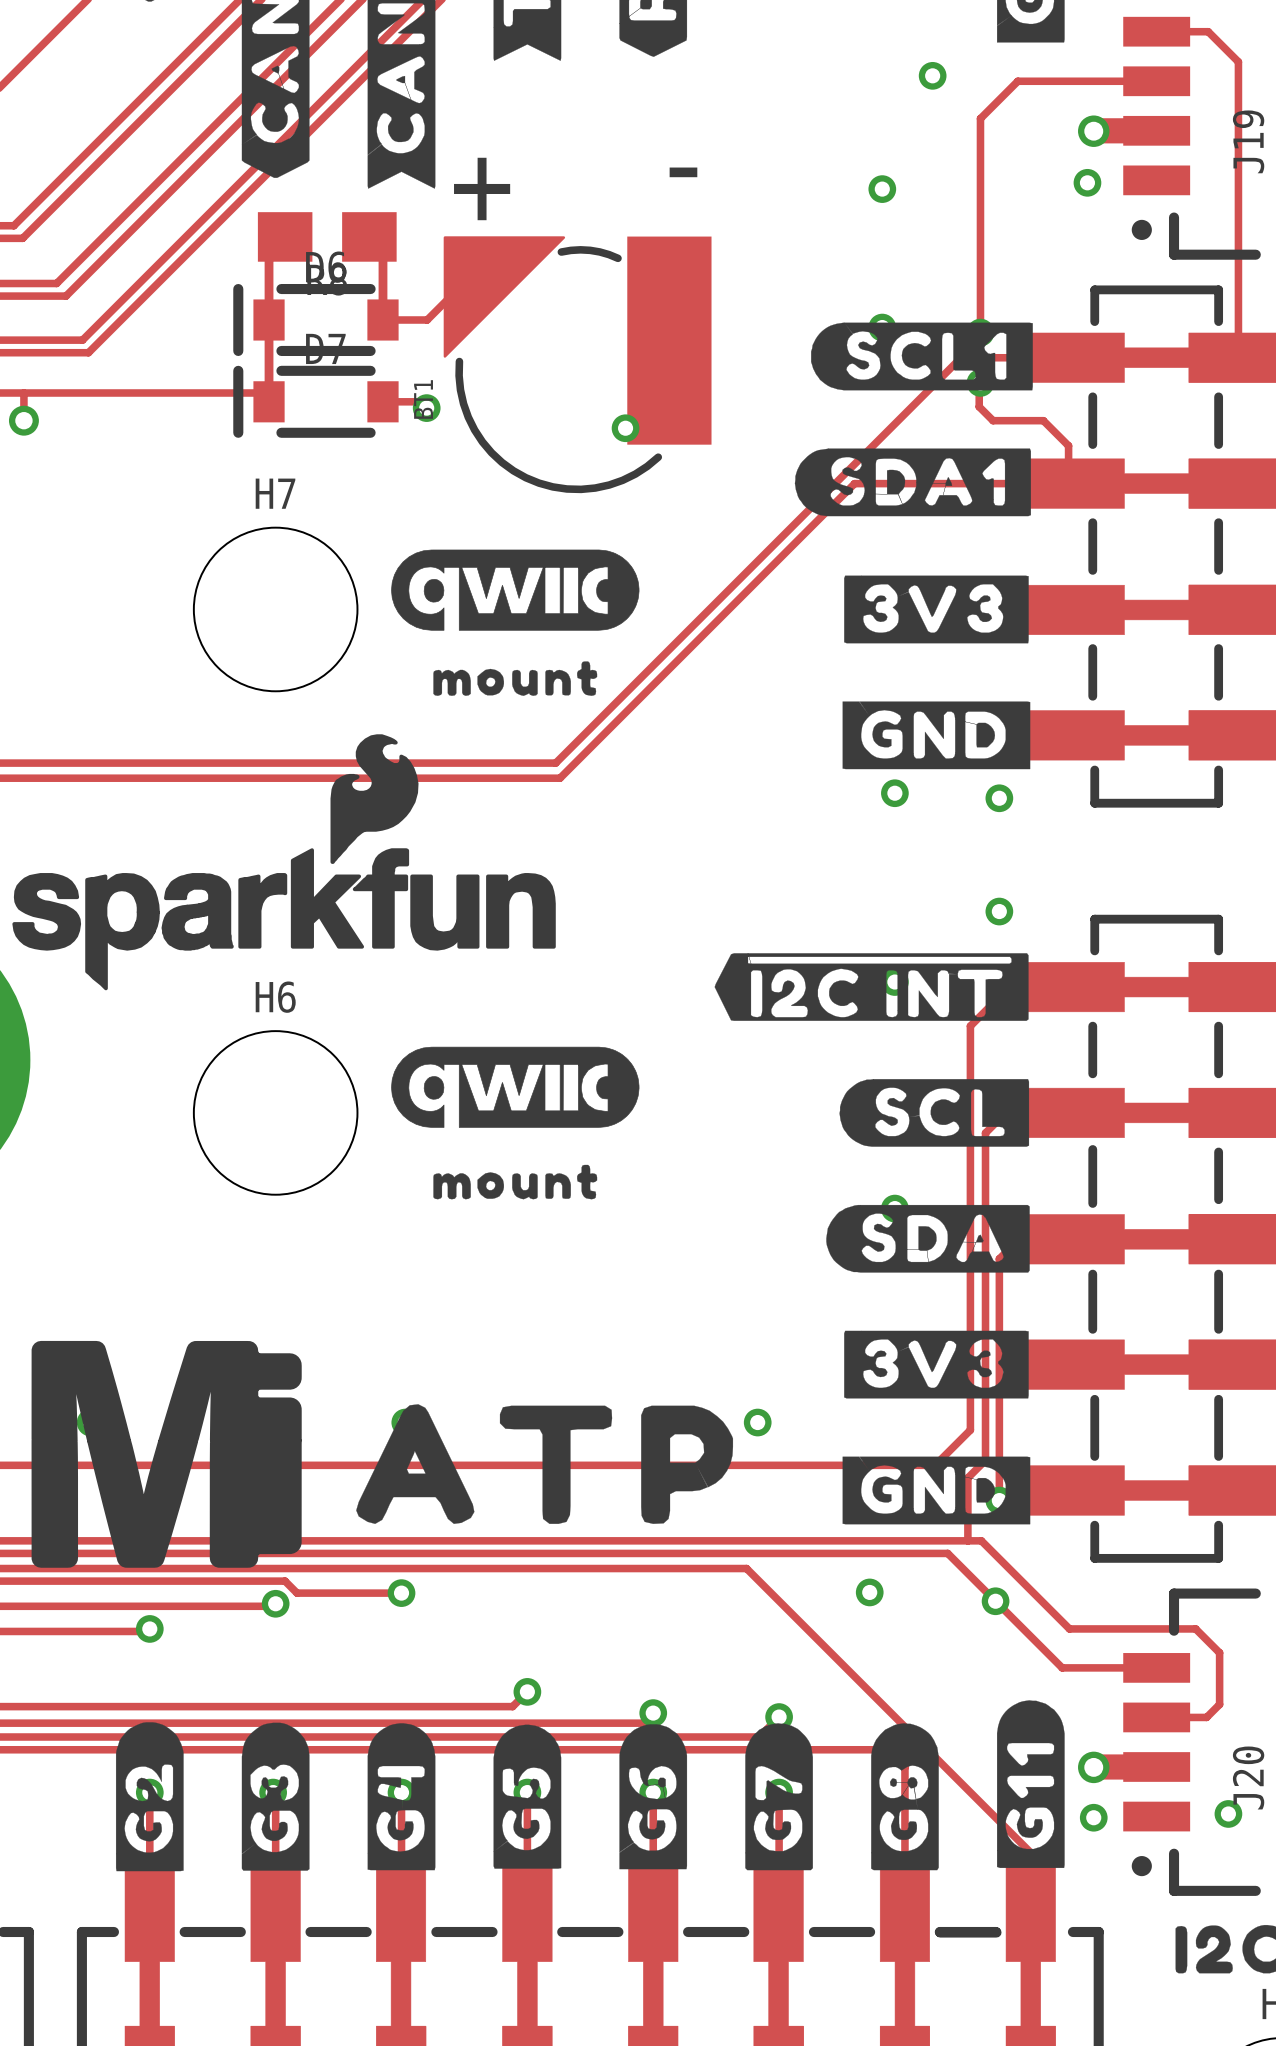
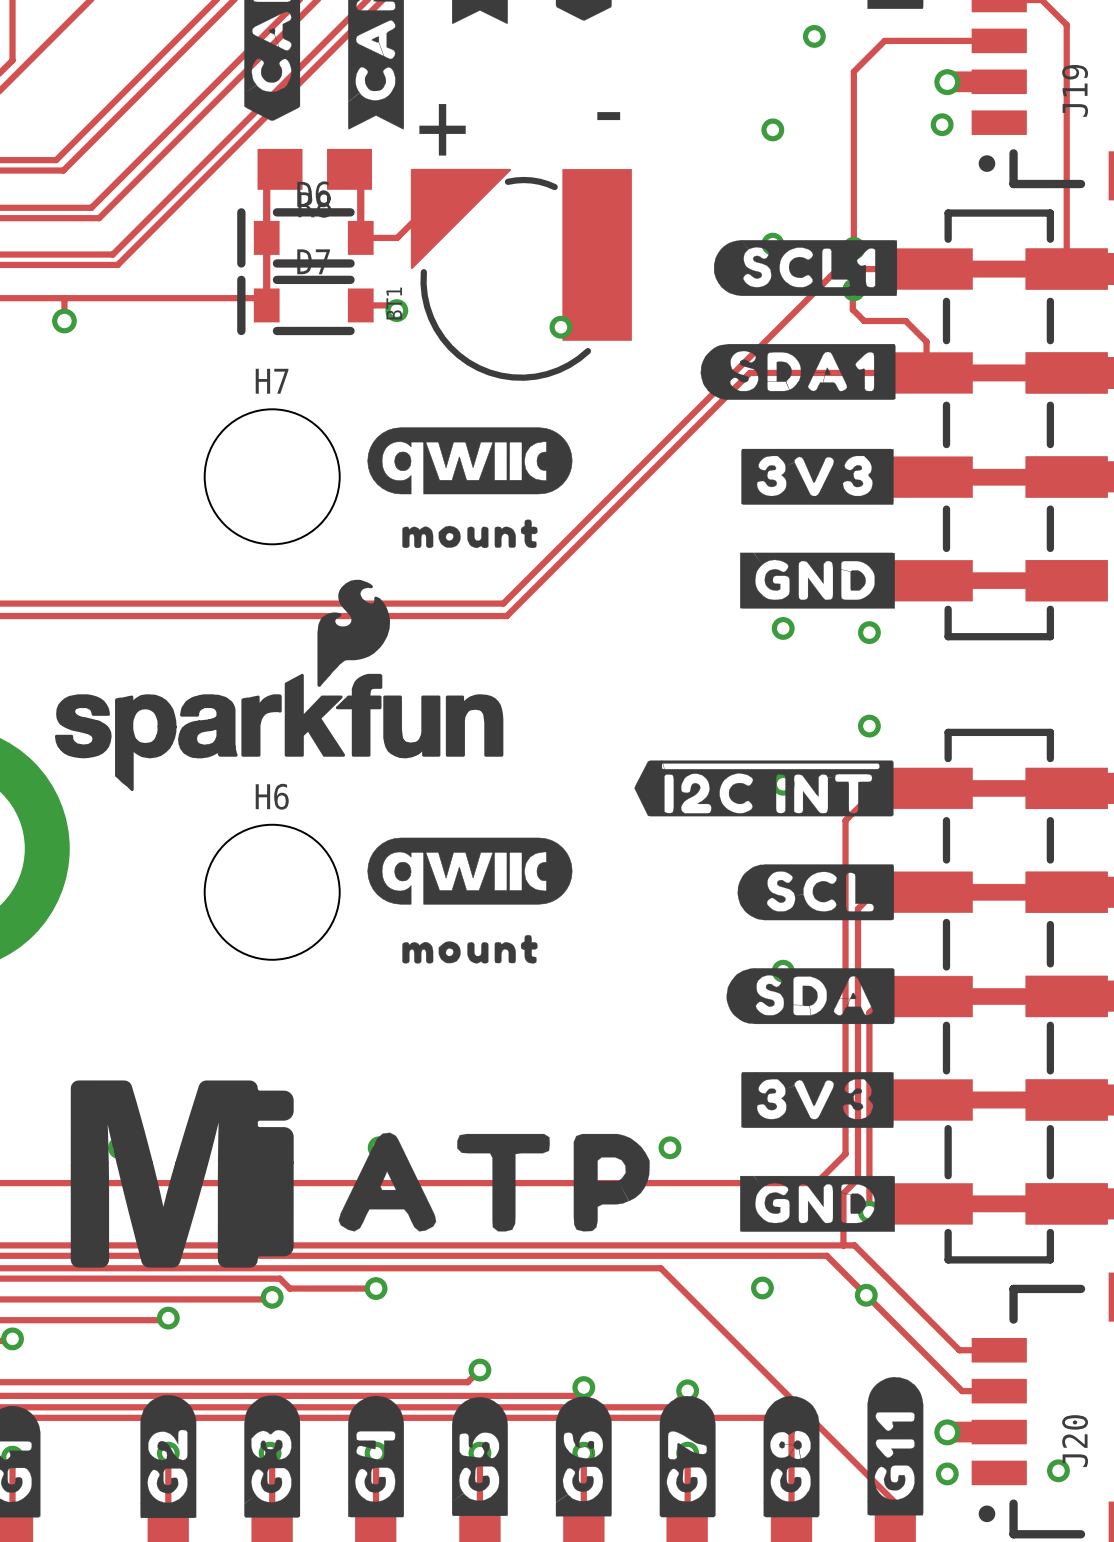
track: (1069, 1628) (1195, 1628) (1219, 1652) (1219, 1704) (1206, 1717) (1156, 1717) -> (921, 1350) (962, 1391) (999, 1391)
track: (1062, 1667) (1108, 1667) -> (927, 1318) (959, 1350)

